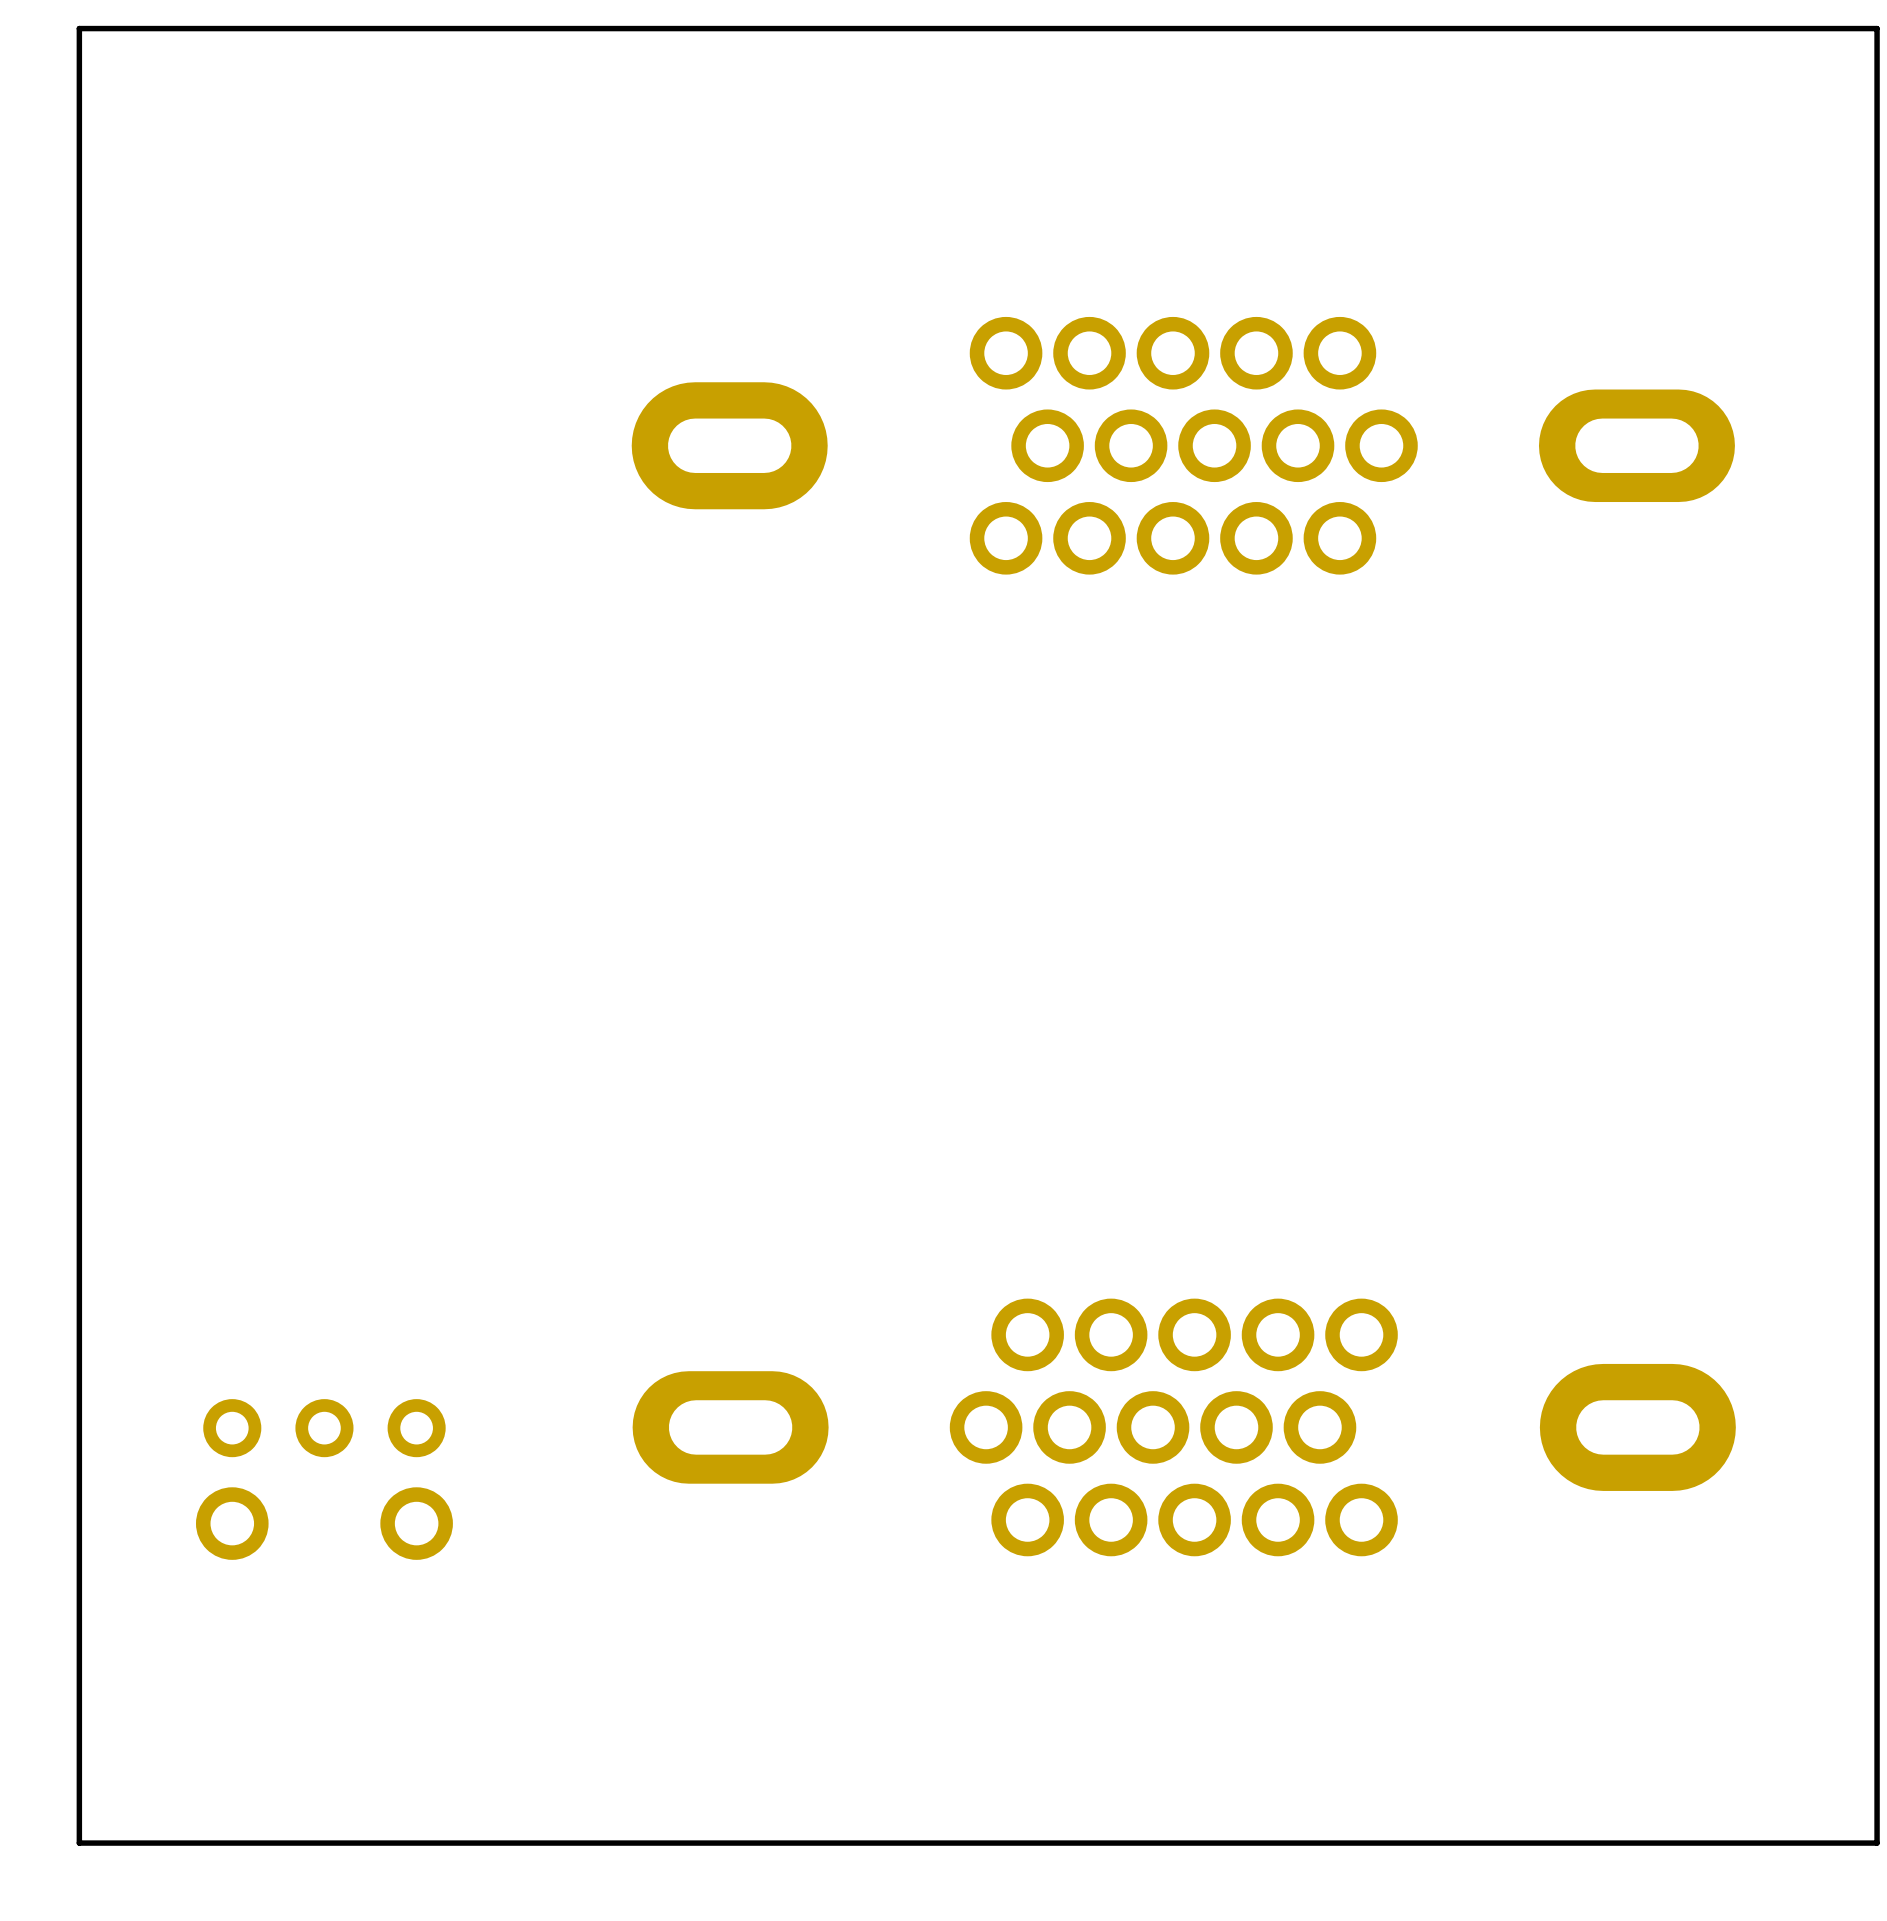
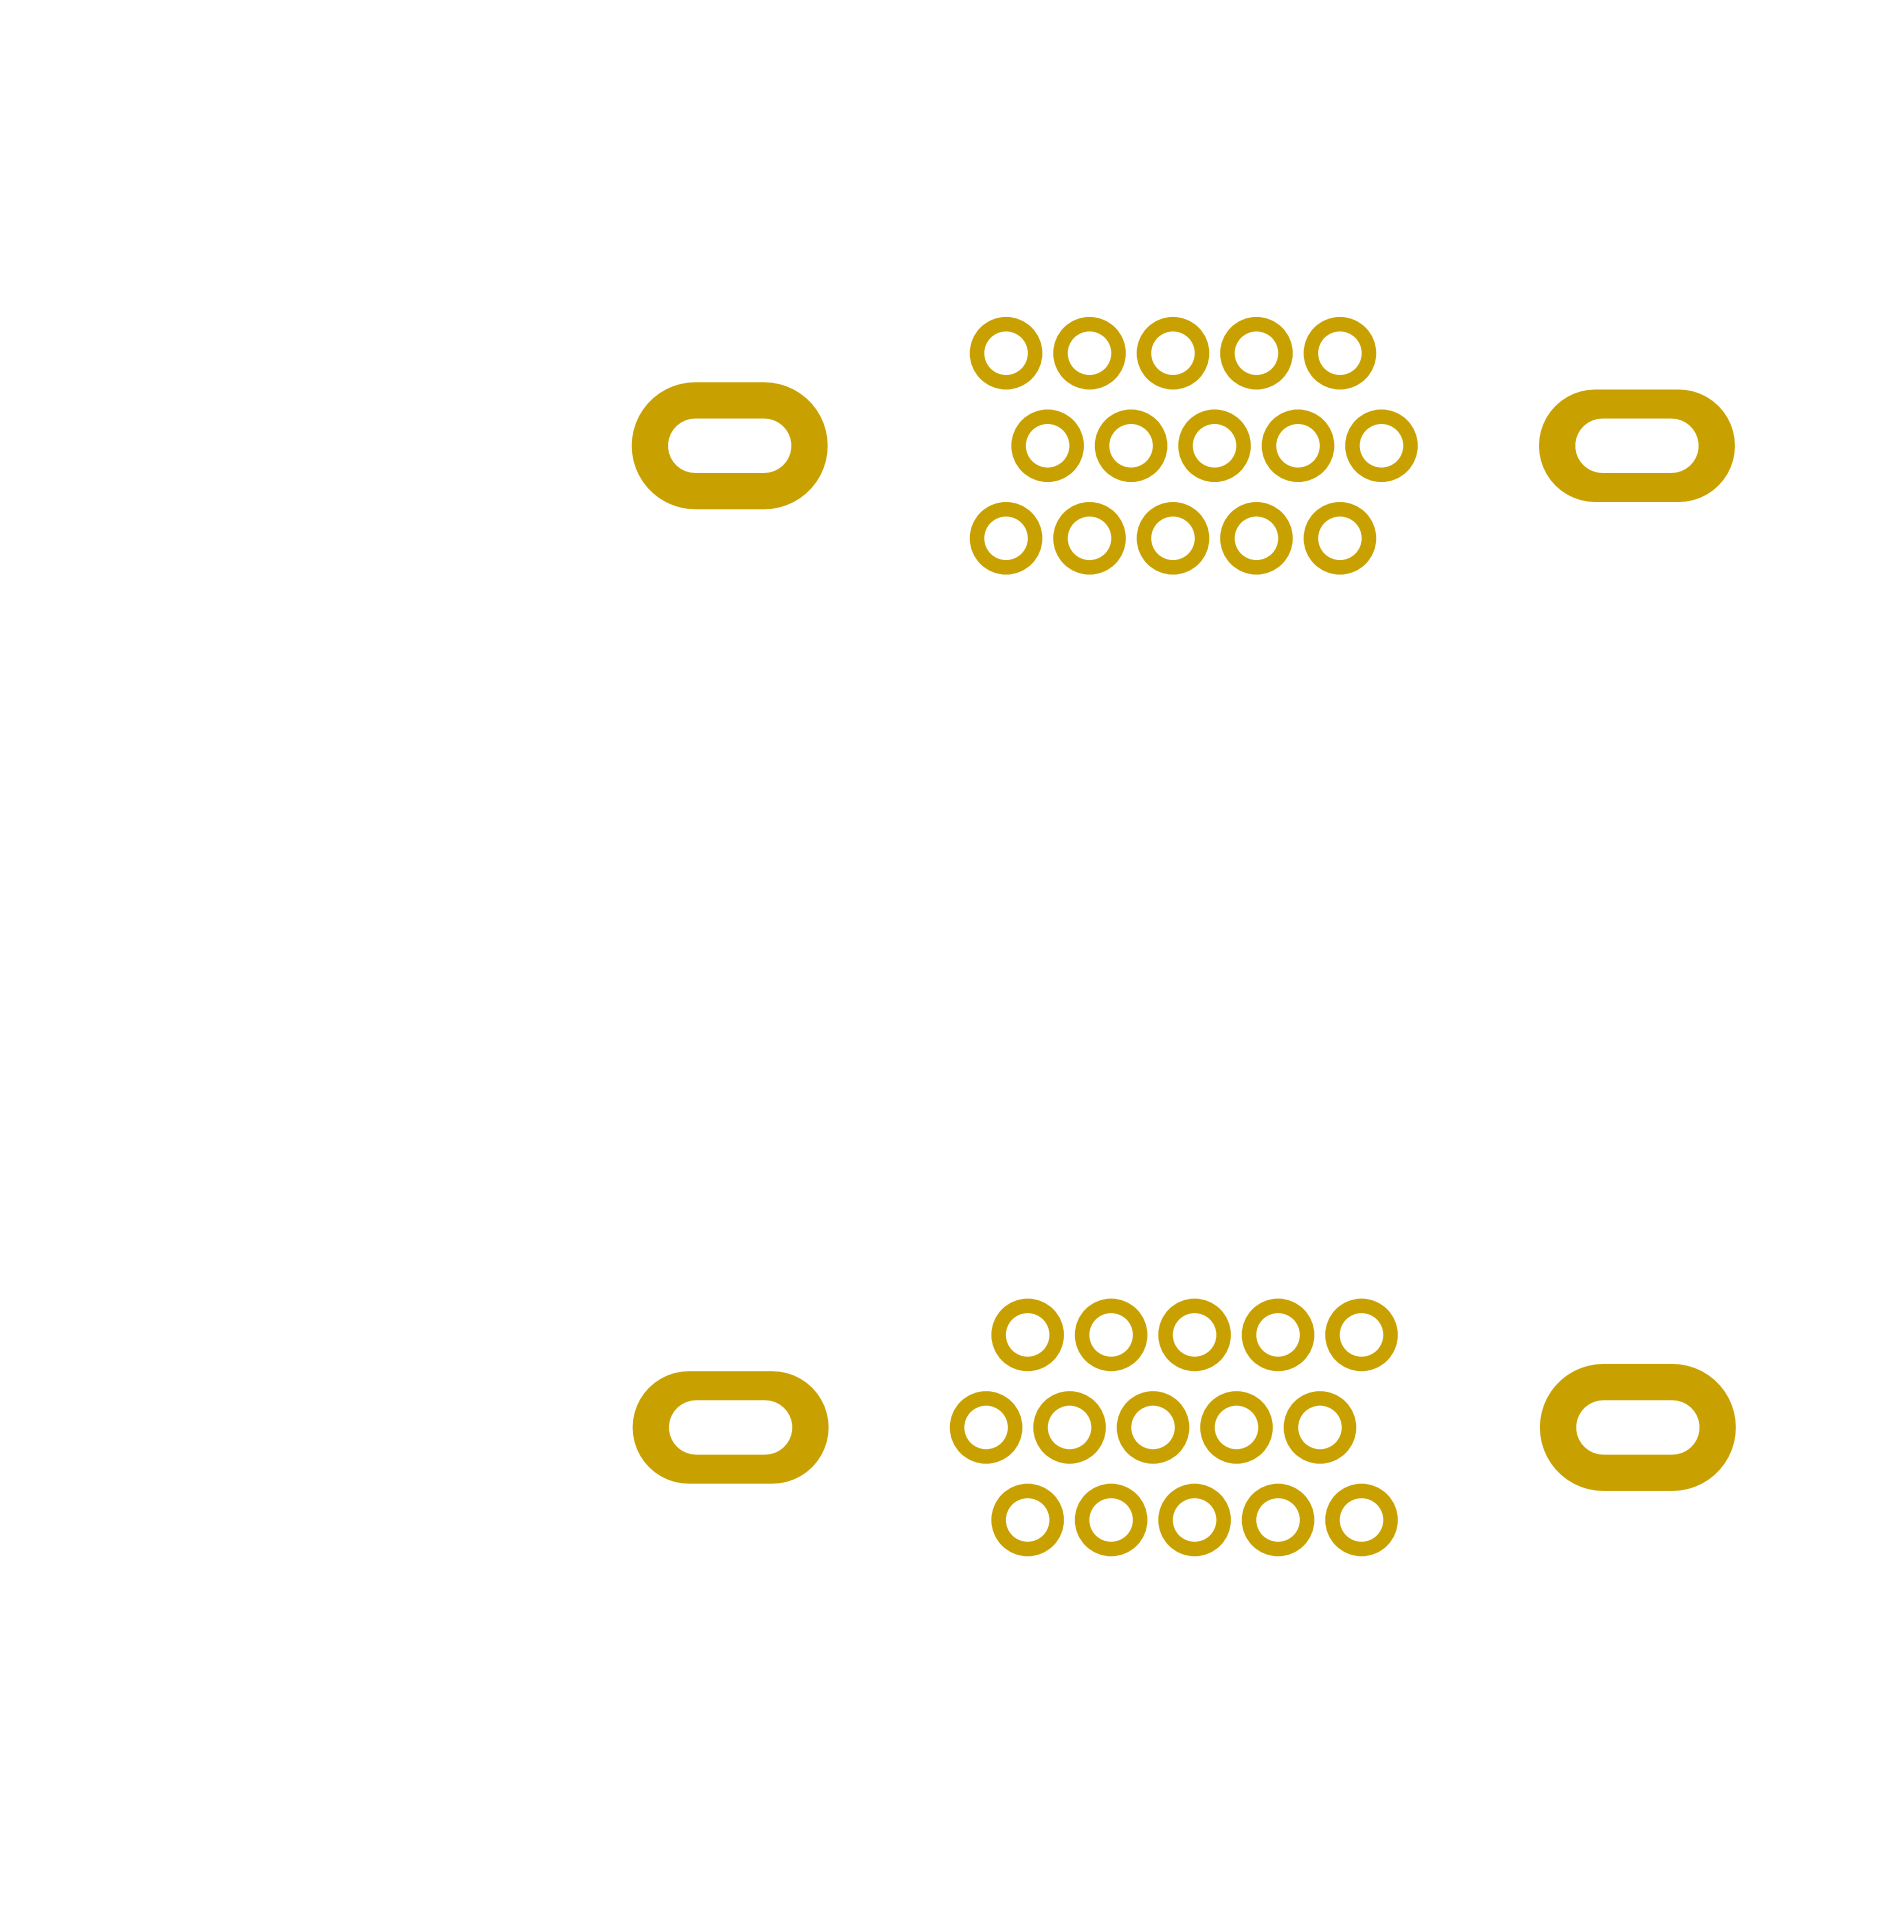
board edge: (1876, 28) (79, 28) (79, 1843) (1876, 1843) -> none
board edge: (1877, 28) (1877, 1843) -> none
part: (324, 1479) -> none

